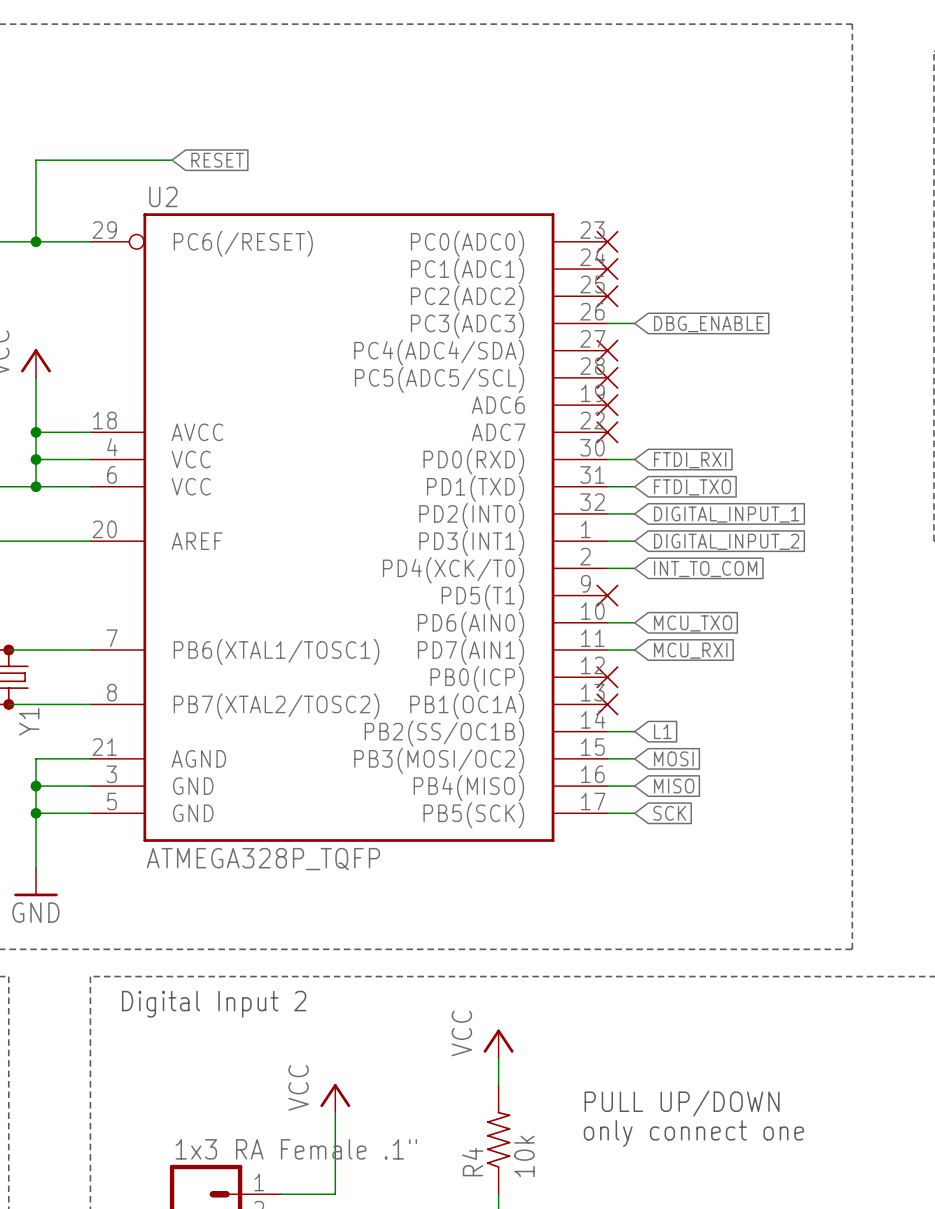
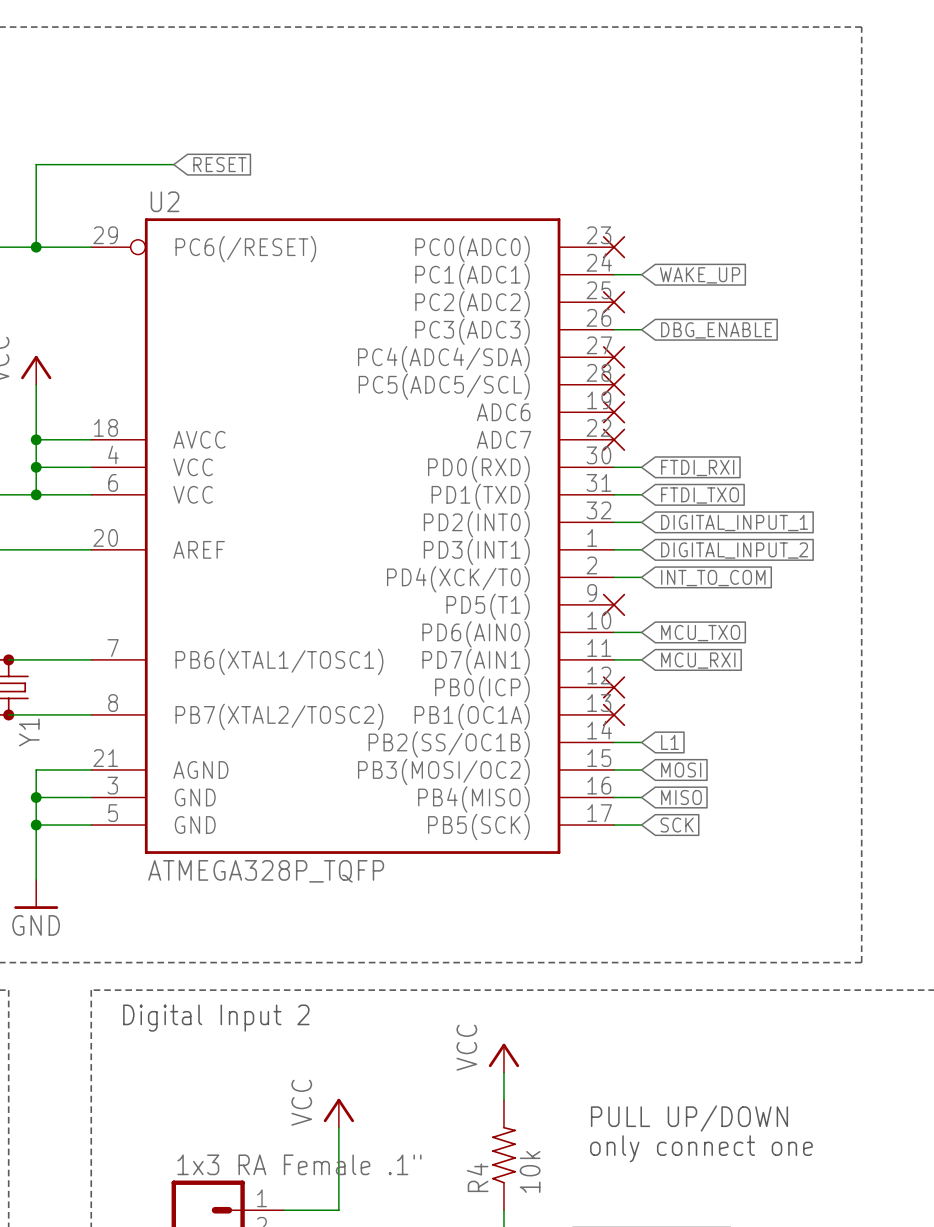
wire: none -> (614, 274) (641, 274)
part: (607, 269) -> none
global label: none -> WAKE_UP (700, 275)

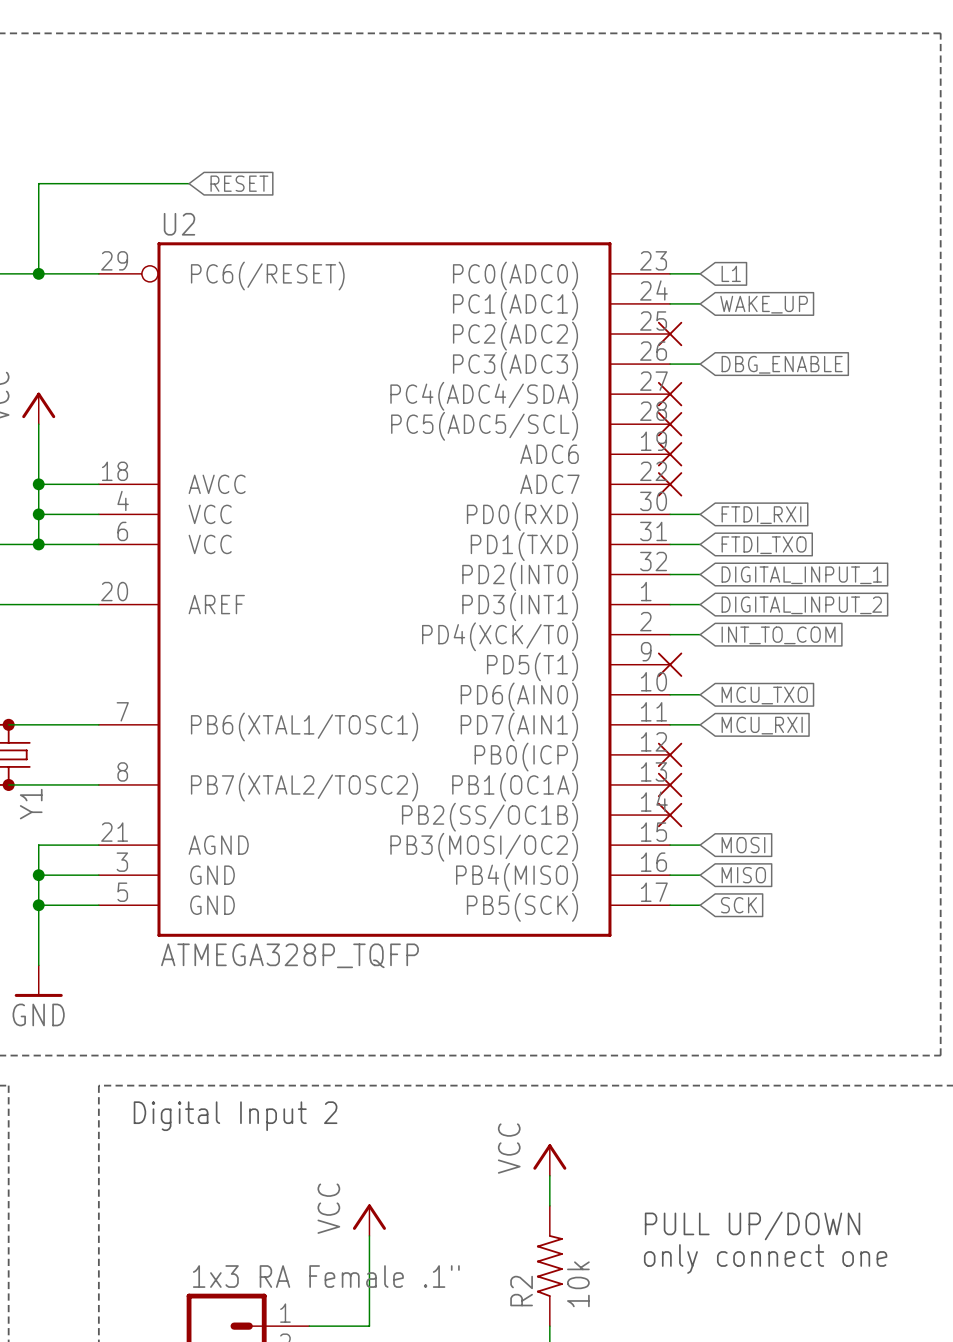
wire: none -> (670, 273) (700, 273)
part: (614, 247) -> none
global label: none -> L1 (731, 273)
wire: (614, 742) (641, 742) -> none
part: none -> (670, 815)
global label: L1 (670, 742) -> none
R4 name: R4 (477, 1177) -> R2 (521, 1291)

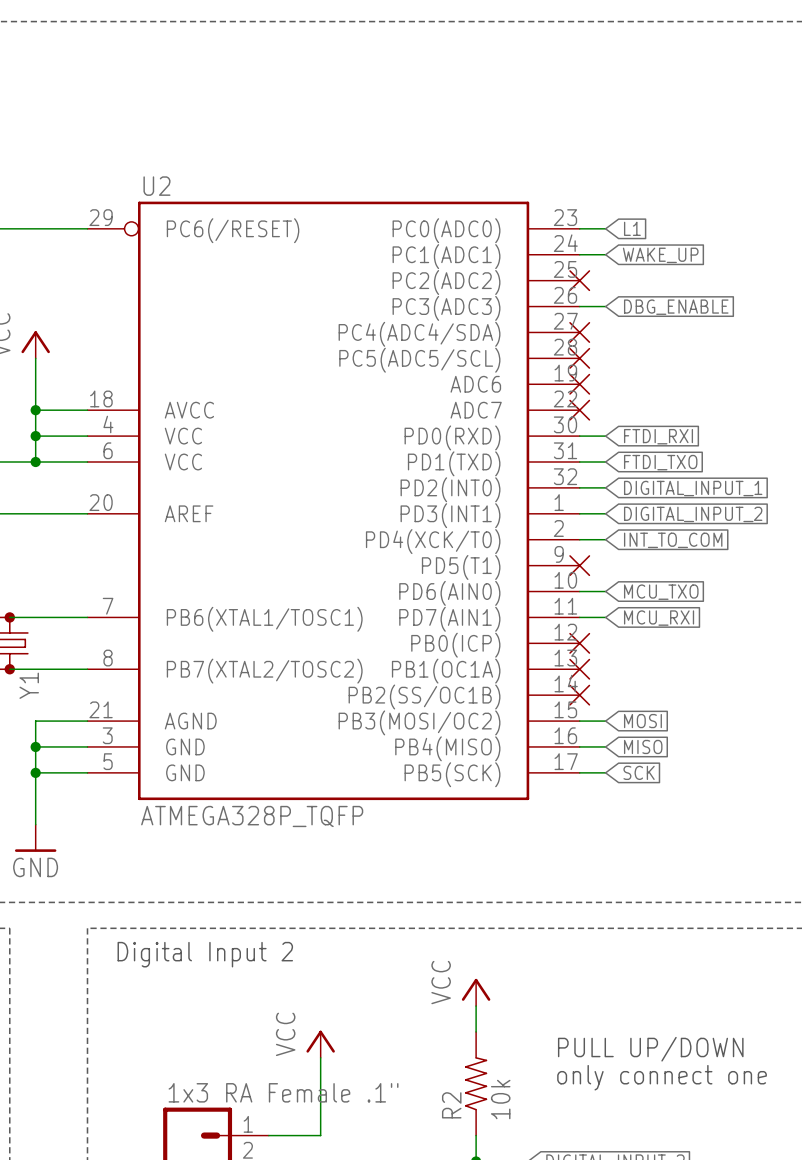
wire: (189, 183) (38, 183) (38, 273) -> none
global label: RESET (239, 183) -> none
junction: (38, 273) -> none

